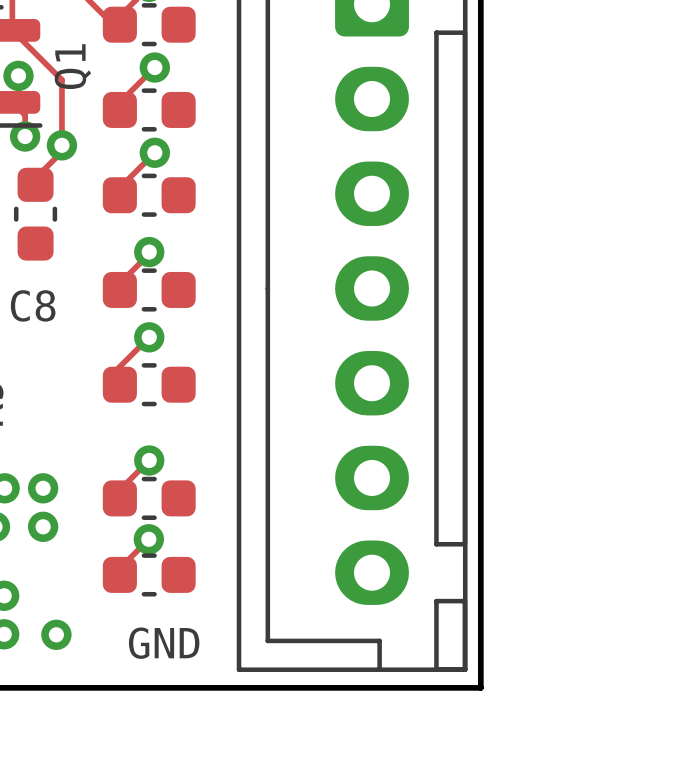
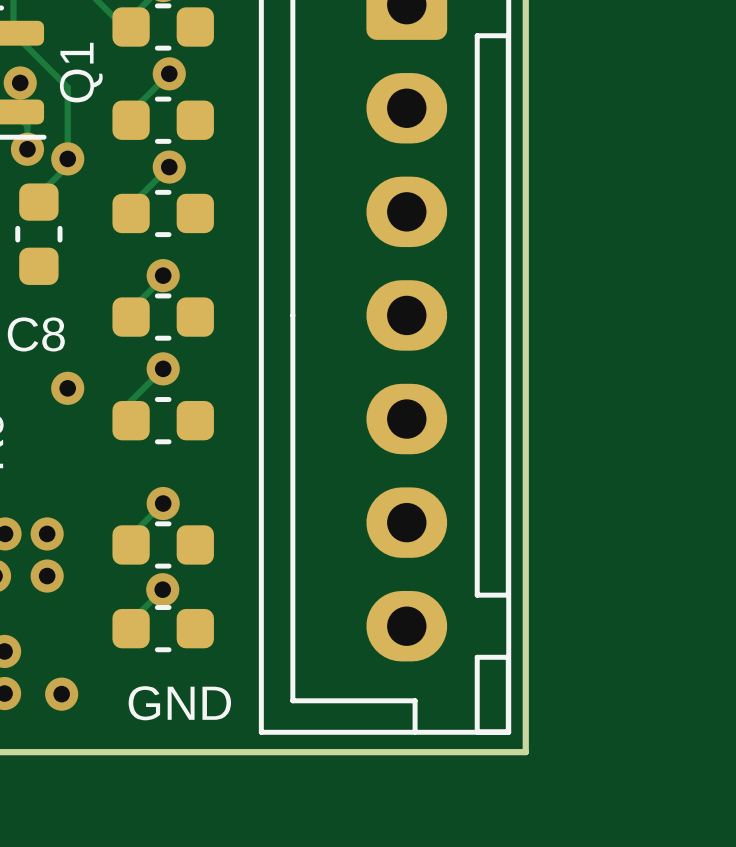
via: none -> (67, 388)

